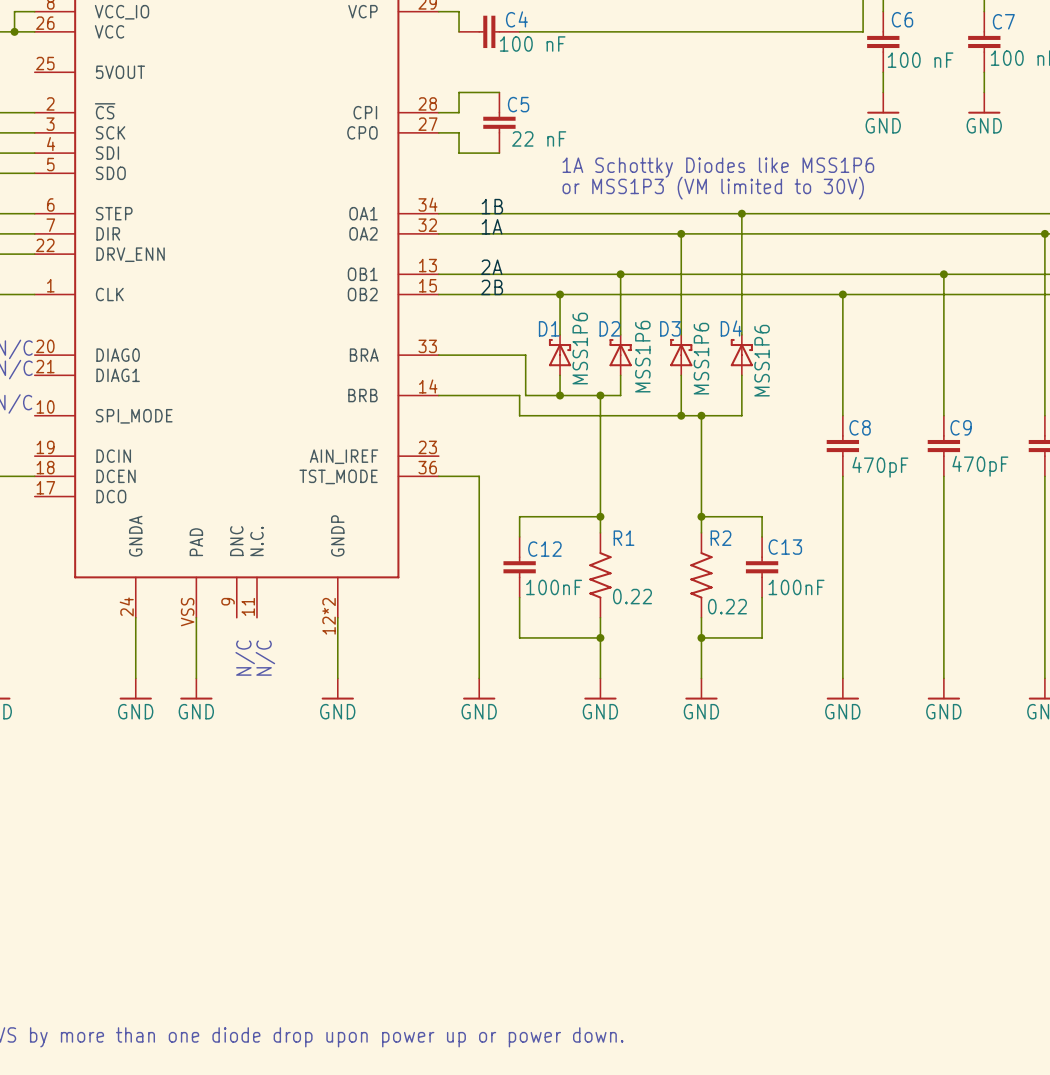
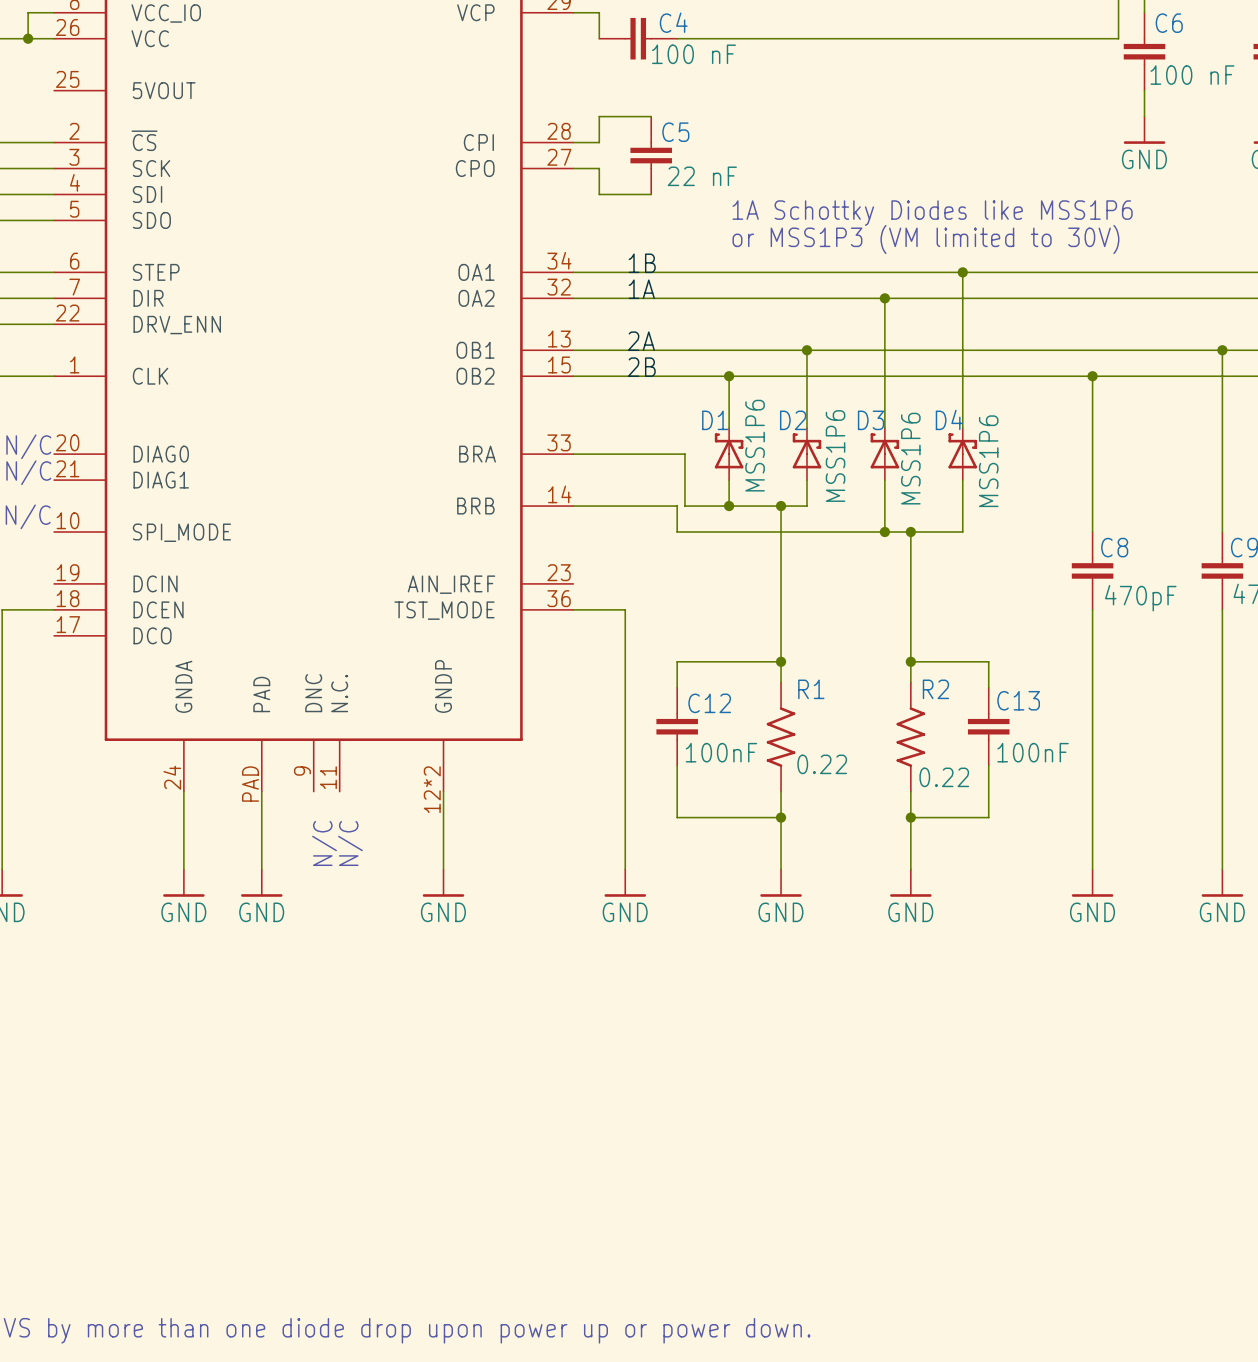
part pin number: VSS (187, 612) -> PAD (250, 784)

